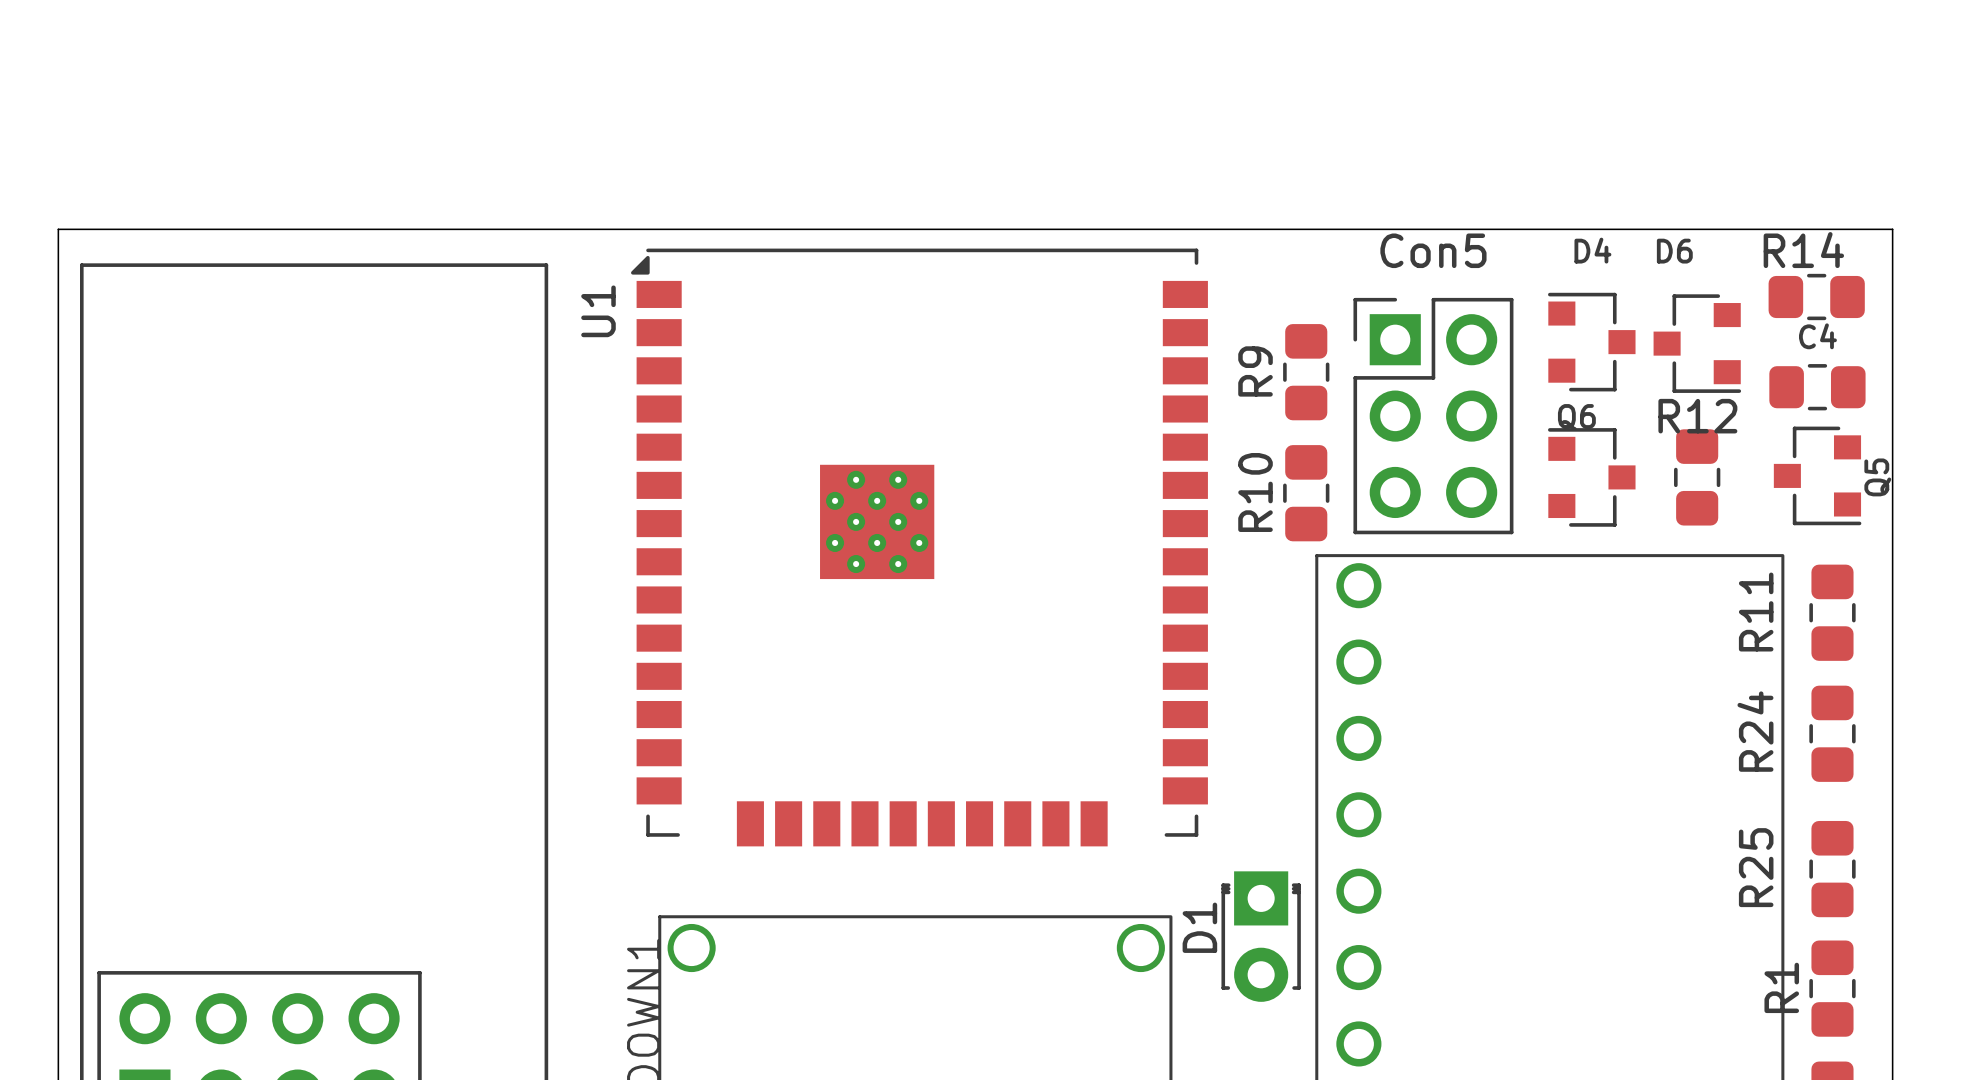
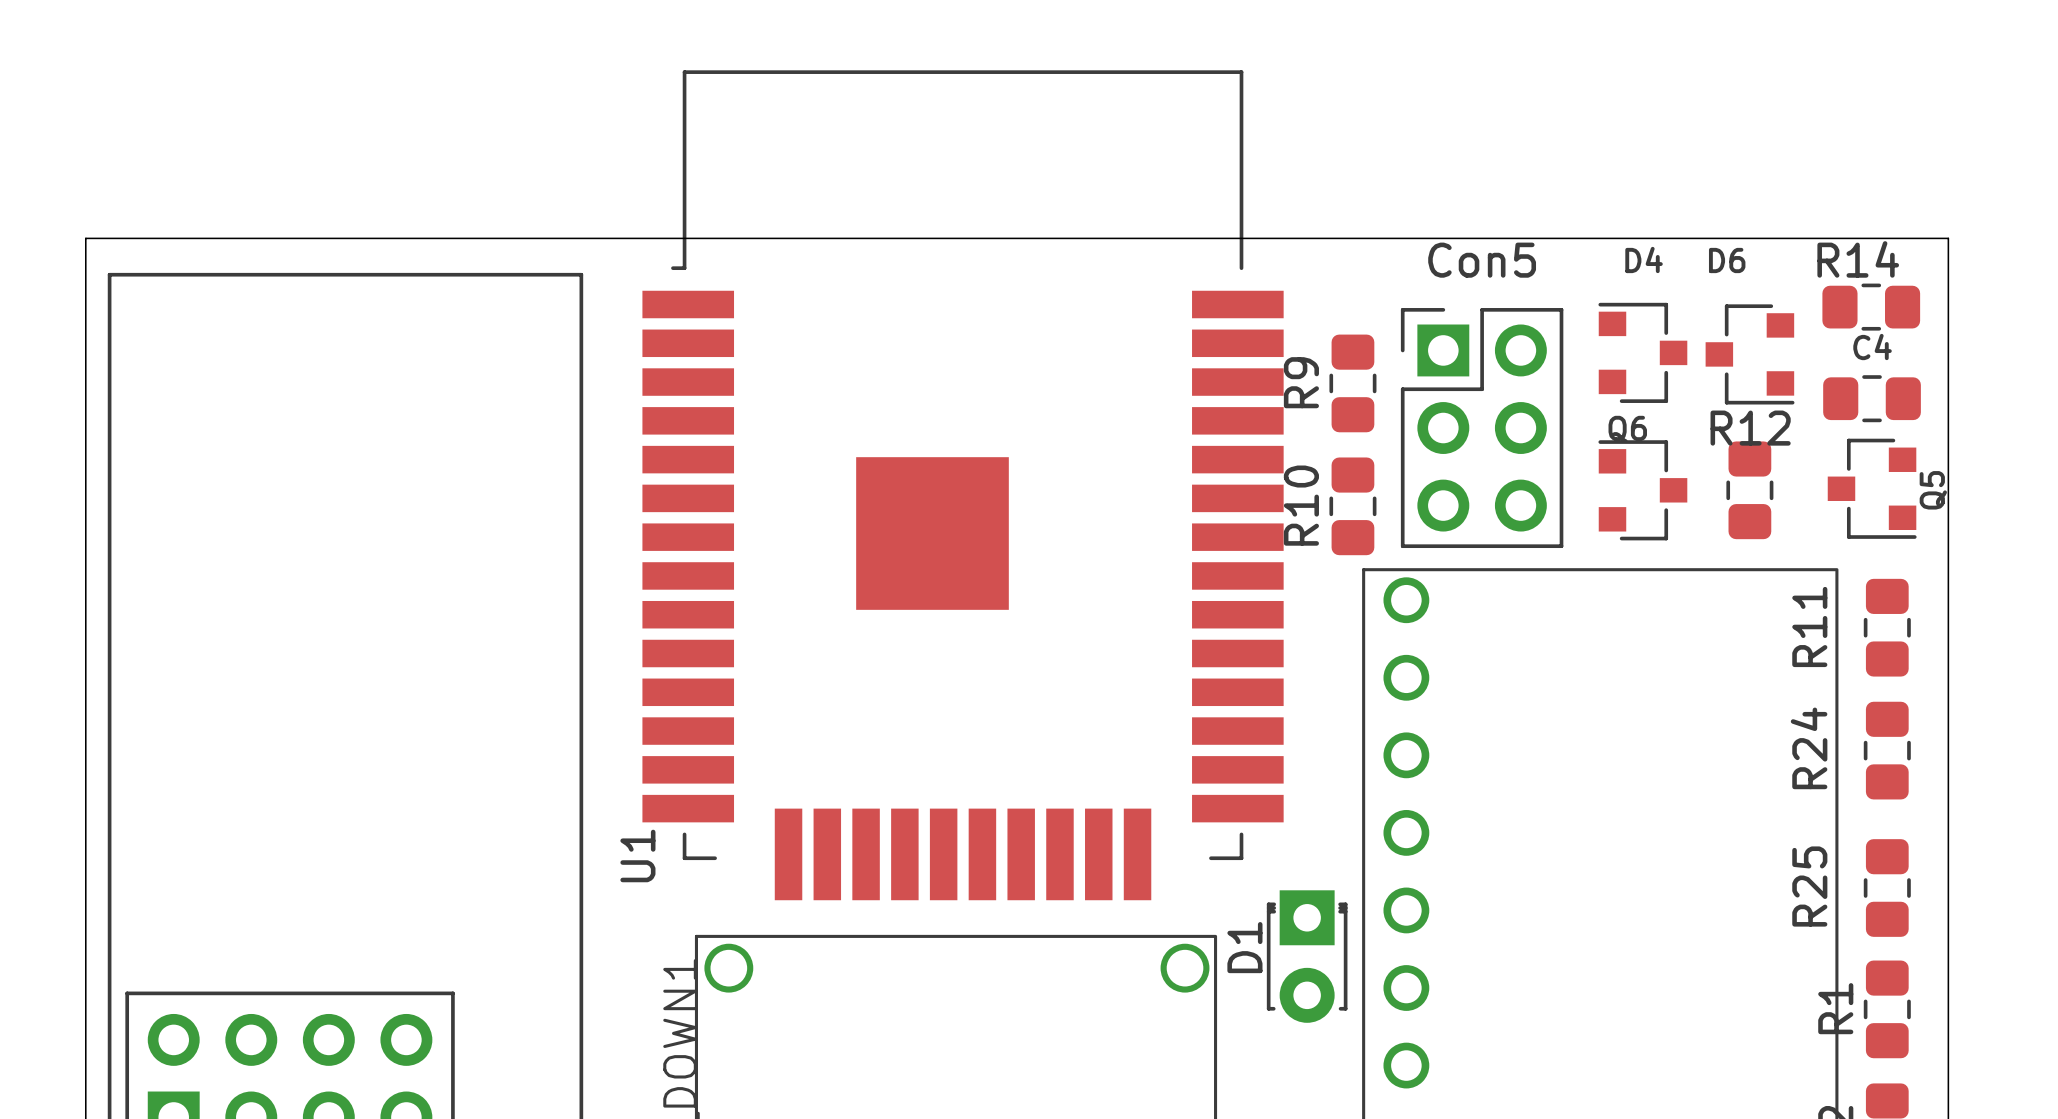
U1 footprint: [631, 248, 1208, 847] -> [642, 70, 1284, 901]
U1 name position: U1 (598, 311) -> U1 (637, 855)

